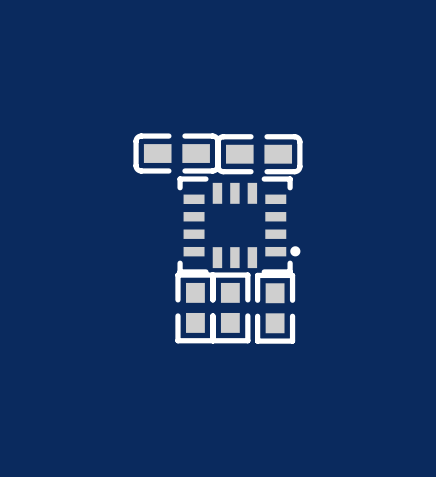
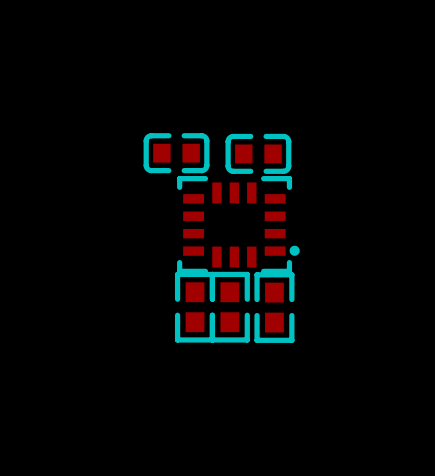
part footprint: [133, 133, 221, 174] -> [143, 133, 210, 174]
part footprint: [215, 134, 303, 175] -> [225, 133, 292, 174]

